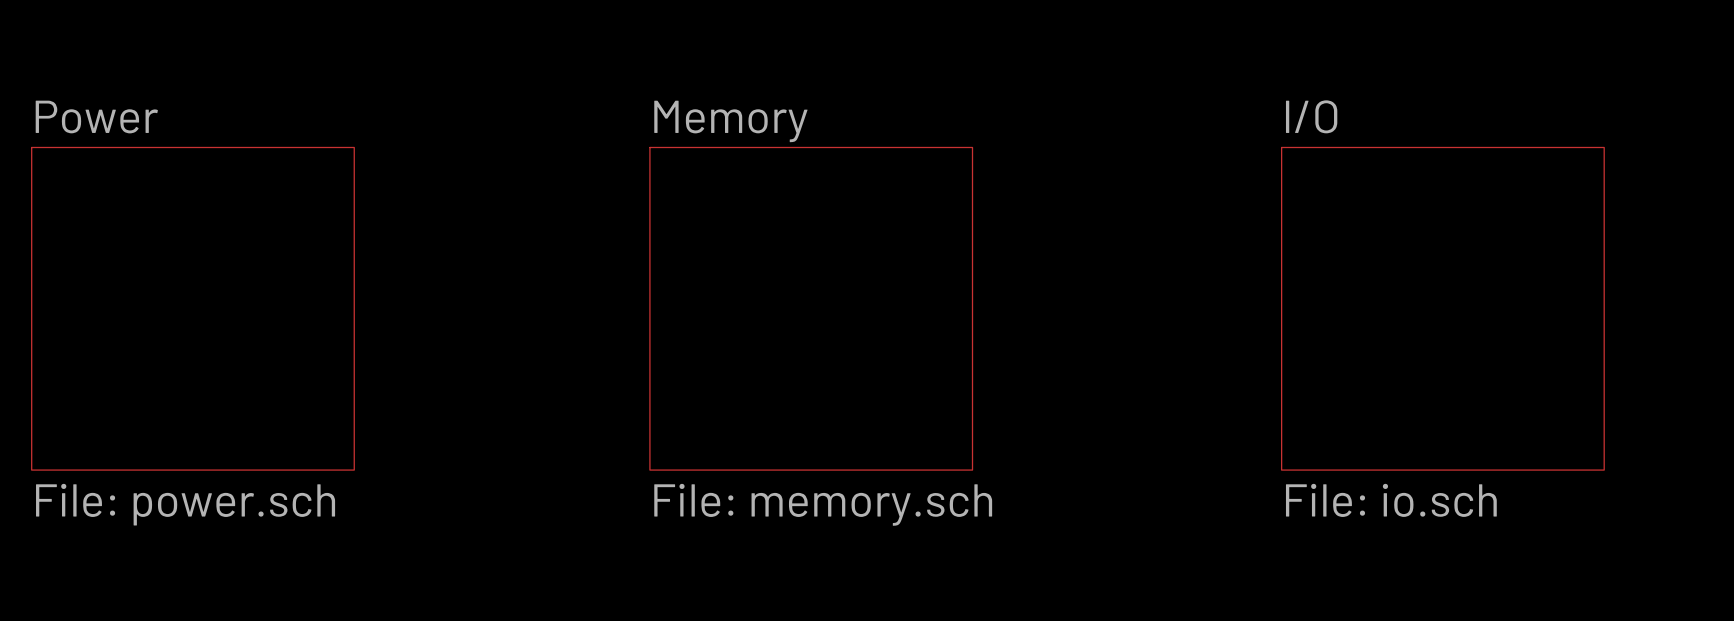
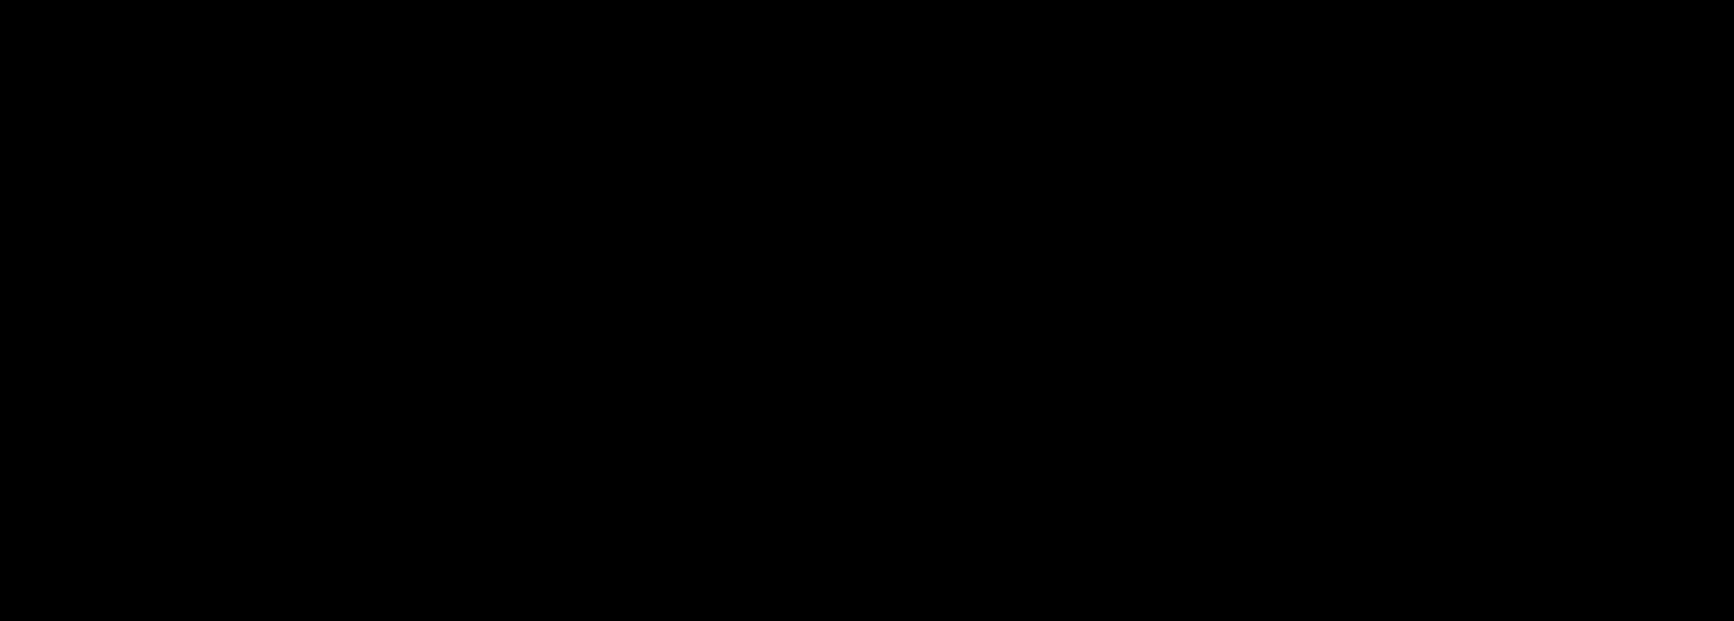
sheet Power: File: power.sch (192, 308) -> none
sheet Memory: File: memory.sch (811, 308) -> none
sheet I/O: File: io.sch (1442, 308) -> none

